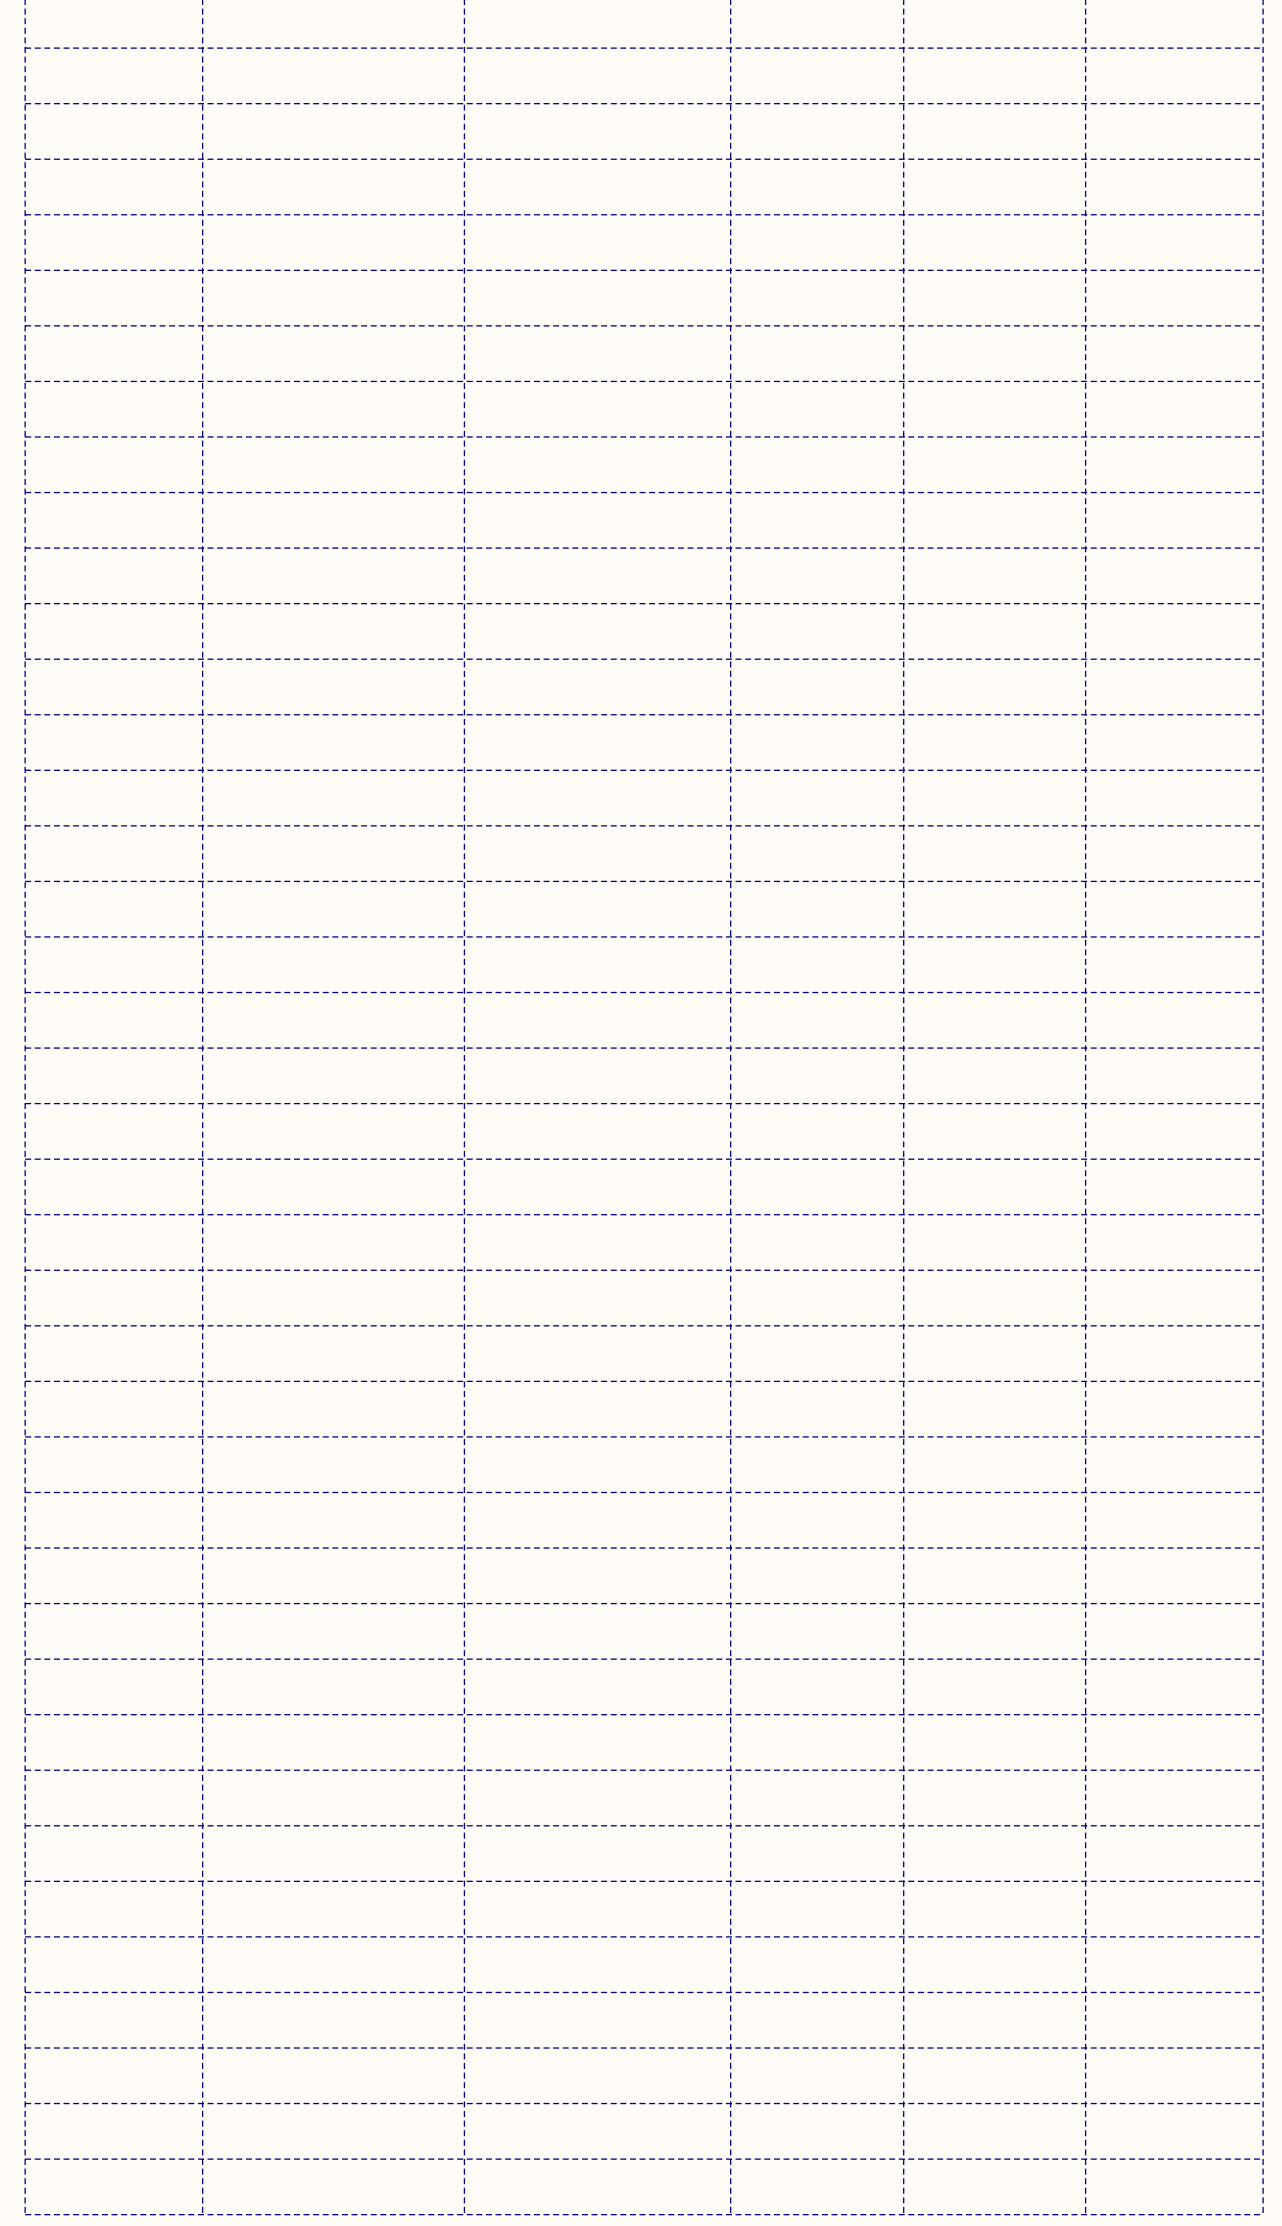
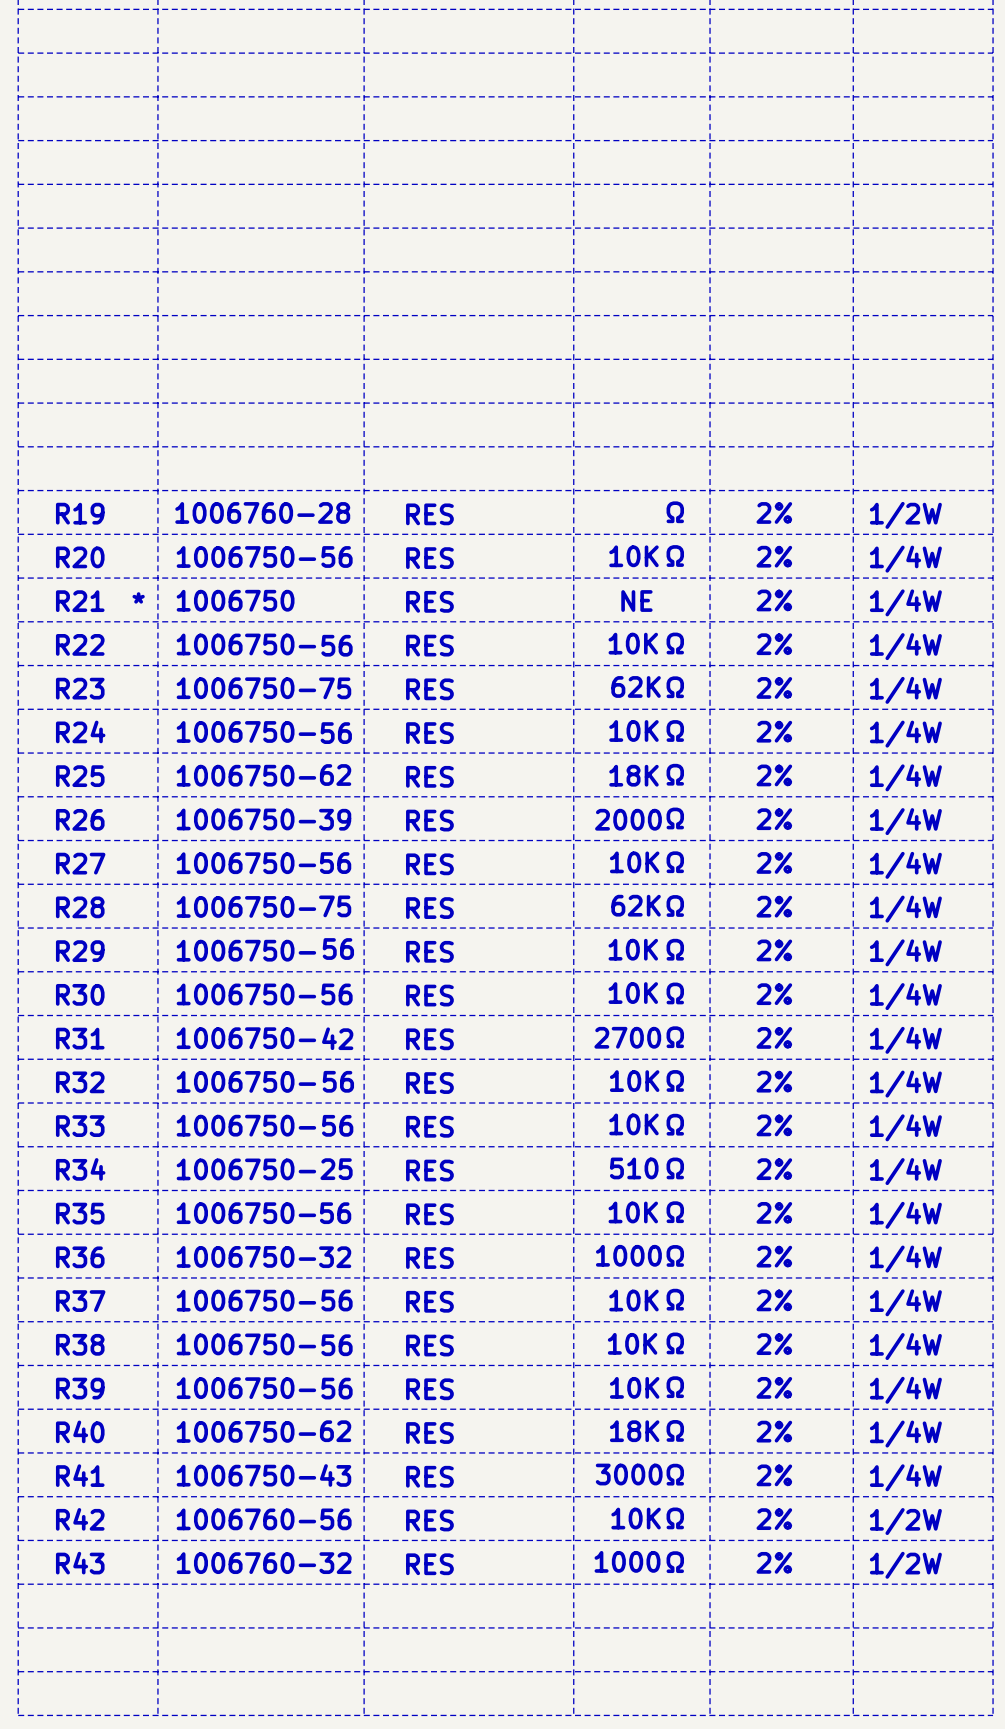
text: none -> Ω (675, 512)
text: none -> 1006760-28 (262, 512)
text: none -> 2% (774, 512)
text: none -> R19 (80, 513)
text: none -> RES (429, 514)
text: none -> 1/2W (905, 515)
text: none -> 10K (633, 556)
text: none -> Ω (675, 556)
text: none -> 1006750- (246, 556)
text: none -> 56 (336, 556)
text: none -> 2% (774, 556)
text: none -> R20 (80, 557)
text: none -> RES (429, 558)
text: none -> 1/4W (905, 559)
text: none -> * (138, 597)
text: none -> 2% (774, 600)
text: none -> R21 (80, 601)
text: none -> 1006750 (235, 600)
text: none -> NE (636, 601)
text: none -> RES (429, 601)
text: none -> 1/4W (905, 602)
text: none -> 10K (633, 643)
text: none -> Ω (675, 643)
text: none -> 1006750- (246, 644)
text: none -> 2% (774, 644)
text: none -> R22 (80, 644)
text: none -> 56 (336, 645)
text: none -> RES (429, 645)
text: none -> 1/4W (905, 646)
text: none -> 62K (636, 686)
text: none -> Ω (675, 687)
text: none -> 2% (774, 687)
text: none -> R23 (80, 688)
text: none -> 1006750- (246, 688)
text: none -> 75 (335, 688)
text: none -> RES (429, 689)
text: none -> 1/4W (905, 690)
text: none -> 10K (633, 730)
text: none -> Ω (675, 730)
text: none -> R24 (80, 731)
text: none -> 1006750- (246, 731)
text: none -> 2% (774, 731)
text: none -> 56 (336, 733)
text: none -> RES (429, 733)
text: none -> 1/4W (905, 734)
text: none -> 62 (335, 775)
text: none -> Ω (675, 774)
text: none -> 2% (774, 775)
text: none -> R25 (80, 776)
text: none -> 1006750- (246, 775)
text: none -> 18K (633, 775)
text: none -> RES (429, 776)
text: none -> 1/4W (905, 777)
text: none -> Ω (675, 818)
text: none -> 1006750- (246, 819)
text: none -> 2% (774, 819)
text: none -> R26 (80, 819)
text: none -> 39 (335, 819)
text: none -> 2000 (628, 819)
text: none -> RES (429, 820)
text: none -> 1/4W (905, 821)
text: none -> 10K (634, 862)
text: none -> Ω (675, 862)
text: none -> R27 (80, 863)
text: none -> 1006750- (246, 863)
text: none -> 56 (335, 863)
text: none -> 2% (774, 862)
text: none -> RES (429, 864)
text: none -> 1/4W (905, 865)
text: none -> 62K (636, 905)
text: none -> Ω (675, 905)
text: none -> 1006750- (246, 906)
text: none -> 75 (335, 906)
text: none -> 2% (774, 906)
text: none -> R28 (80, 907)
text: none -> RES (429, 908)
text: none -> 1/4W (905, 909)
text: none -> 56 (338, 949)
text: none -> 10K (633, 949)
text: none -> Ω (675, 949)
text: none -> 1006750- (246, 950)
text: none -> 2% (774, 950)
text: none -> R29 (80, 951)
text: none -> RES (429, 951)
text: none -> 1/4W (905, 952)
text: none -> 10K (633, 993)
text: none -> Ω (675, 993)
text: none -> 2% (774, 994)
text: none -> R30 (80, 994)
text: none -> 1006750- (246, 994)
text: none -> 56 (336, 994)
text: none -> RES (429, 995)
text: none -> 1/4W (905, 996)
text: none -> Ω (675, 1037)
text: none -> 1006750- (246, 1038)
text: none -> 2700 (627, 1037)
text: none -> 2% (774, 1037)
text: none -> R31 (80, 1038)
text: none -> 42 (337, 1038)
text: none -> RES (429, 1039)
text: none -> 1/4W (905, 1040)
text: none -> Ω (675, 1080)
text: none -> 56 (338, 1081)
text: none -> 10K (634, 1081)
text: none -> 2% (774, 1081)
text: none -> R32 (80, 1082)
text: none -> 1006750- (246, 1081)
text: none -> RES (429, 1083)
text: none -> 1/4W (905, 1084)
text: none -> 10K (633, 1124)
text: none -> Ω (675, 1124)
text: none -> 1006750- (246, 1125)
text: none -> 56 (337, 1125)
text: none -> 2% (774, 1125)
text: none -> R33 (80, 1126)
text: none -> RES (429, 1126)
text: none -> 1/4W (905, 1127)
text: none -> 25 (336, 1169)
text: none -> 510 (634, 1168)
text: none -> Ω (675, 1168)
text: none -> 2% (774, 1169)
text: none -> R34 (80, 1169)
text: none -> 1006750- (246, 1169)
text: none -> RES (429, 1170)
text: none -> 1/4W (905, 1171)
text: none -> 10K (633, 1212)
text: none -> Ω (675, 1212)
text: none -> 1006750- (246, 1213)
text: none -> 56 (335, 1213)
text: none -> 2% (774, 1212)
text: none -> R35 (80, 1213)
text: none -> RES (429, 1214)
text: none -> 1/4W (905, 1215)
text: none -> 1000 (628, 1255)
text: none -> Ω (675, 1255)
text: none -> R36 (80, 1257)
text: none -> 1006750- (246, 1256)
text: none -> 32 (335, 1257)
text: none -> 2% (774, 1256)
text: none -> RES (429, 1258)
text: none -> 1/4W (905, 1259)
text: none -> Ω (675, 1299)
text: none -> 1006750- (246, 1300)
text: none -> 56 (336, 1300)
text: none -> 10K (633, 1300)
text: none -> 2% (774, 1300)
text: none -> R37 (80, 1301)
text: none -> RES (429, 1301)
text: none -> 1/4W (905, 1302)
text: none -> 10K (632, 1343)
text: none -> Ω (675, 1343)
text: none -> 1006750- (246, 1344)
text: none -> 2% (774, 1344)
text: none -> R38 (80, 1344)
text: none -> 56 (336, 1345)
text: none -> RES (429, 1345)
text: none -> 1/4W (905, 1346)
text: none -> Ω (675, 1387)
text: none -> 10K (634, 1387)
text: none -> 2% (774, 1387)
text: none -> R39 (80, 1388)
text: none -> 1006750- (246, 1388)
text: none -> 56 (336, 1388)
text: none -> RES (429, 1389)
text: none -> 1/4W (905, 1390)
text: none -> 62 (335, 1431)
text: none -> 18K (634, 1431)
text: none -> Ω (675, 1430)
text: none -> R40 (80, 1431)
text: none -> 1006750- (246, 1431)
text: none -> 2% (774, 1431)
text: none -> RES (429, 1433)
text: none -> 1/4W (905, 1434)
text: none -> 3000 (629, 1474)
text: none -> Ω (675, 1474)
text: none -> 43 (335, 1475)
text: none -> 2% (774, 1475)
text: none -> R41 (80, 1475)
text: none -> 1006750- (246, 1475)
text: none -> RES (429, 1476)
text: none -> 1/4W (905, 1477)
text: none -> 10K (636, 1518)
text: none -> Ω (675, 1518)
text: none -> R42 (80, 1519)
text: none -> 1006760-56 (264, 1519)
text: none -> 2% (774, 1519)
text: none -> RES (429, 1520)
text: none -> 1/2W (905, 1521)
text: none -> 1000 (627, 1561)
text: none -> Ω (675, 1562)
text: none -> 2% (774, 1562)
text: none -> R43 (80, 1563)
text: none -> 1006760-32 (264, 1563)
text: none -> RES (429, 1564)
text: none -> 1/2W (905, 1565)

